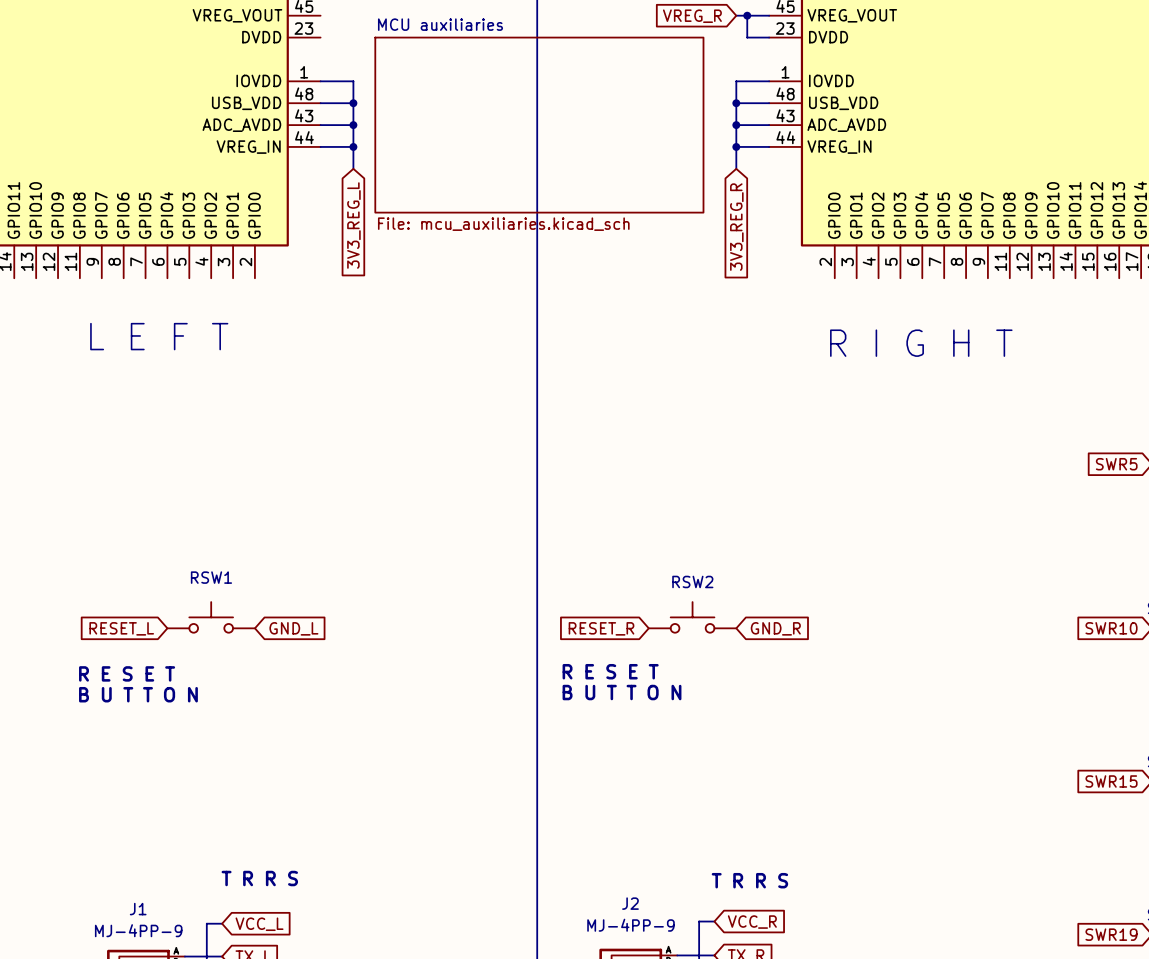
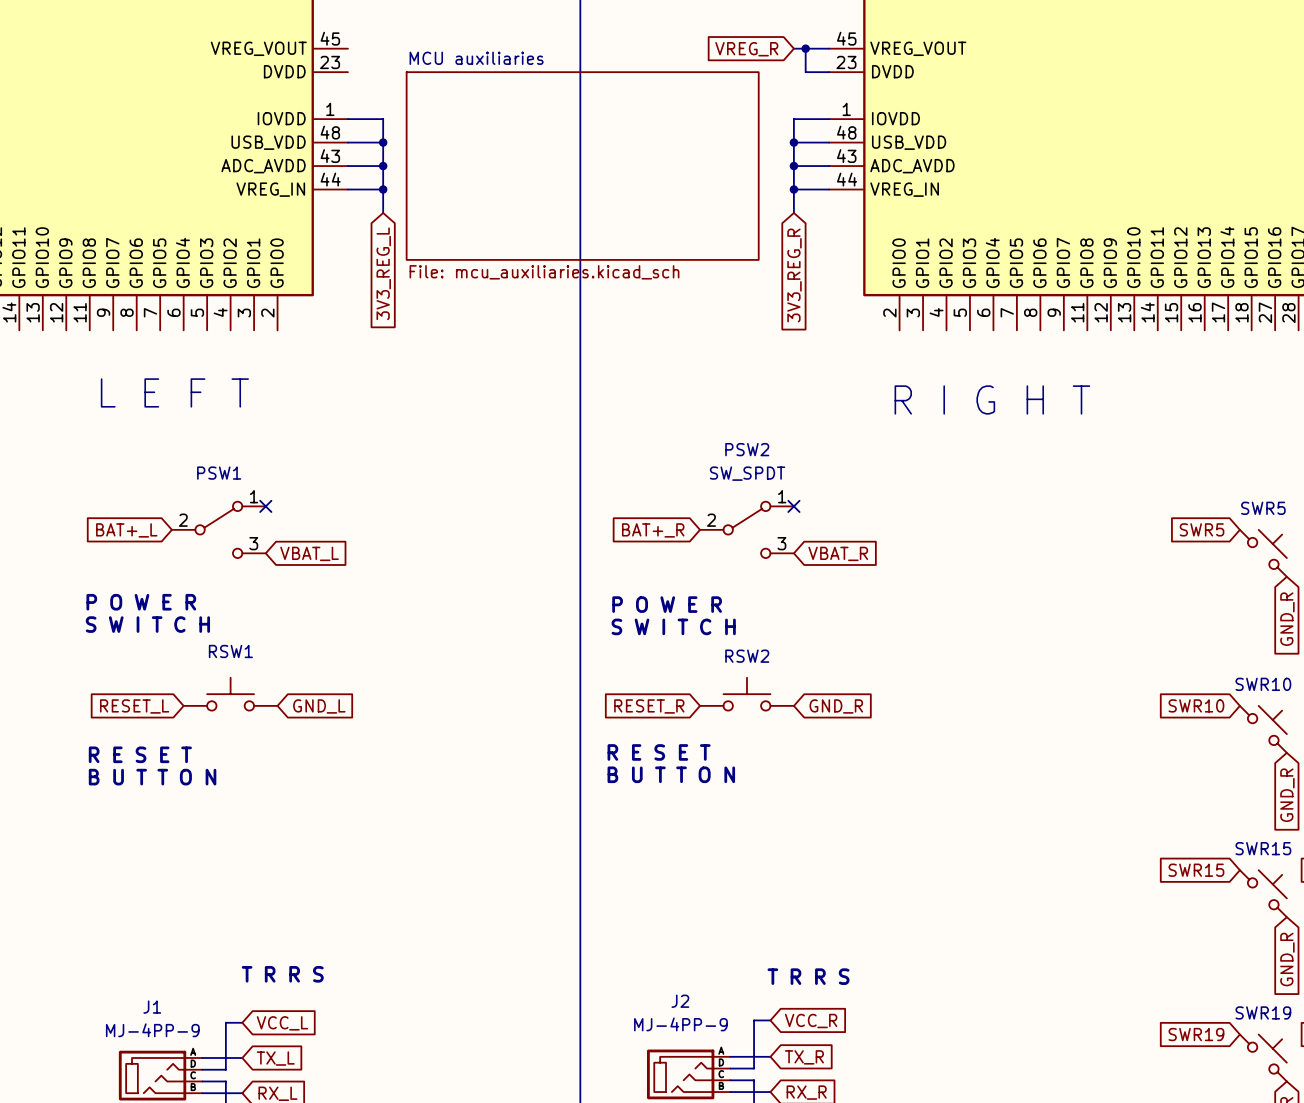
no-connect mark: none -> (265, 506)
no-connect mark: none -> (793, 506)
global label: none -> BAT+_L (126, 530)
PSW1: none -> (218, 529)
global label: none -> BAT+_R (653, 530)
PSW2: none -> SW_SPDT (746, 529)
global label: none -> VBAT_L (309, 553)
global label: none -> VBAT_R (838, 553)
text: none -> P O W E R (141, 602)
text: none -> P O W E R (667, 604)
text: none -> S W I T C H (147, 624)
text: none -> S W I T C H (673, 626)

